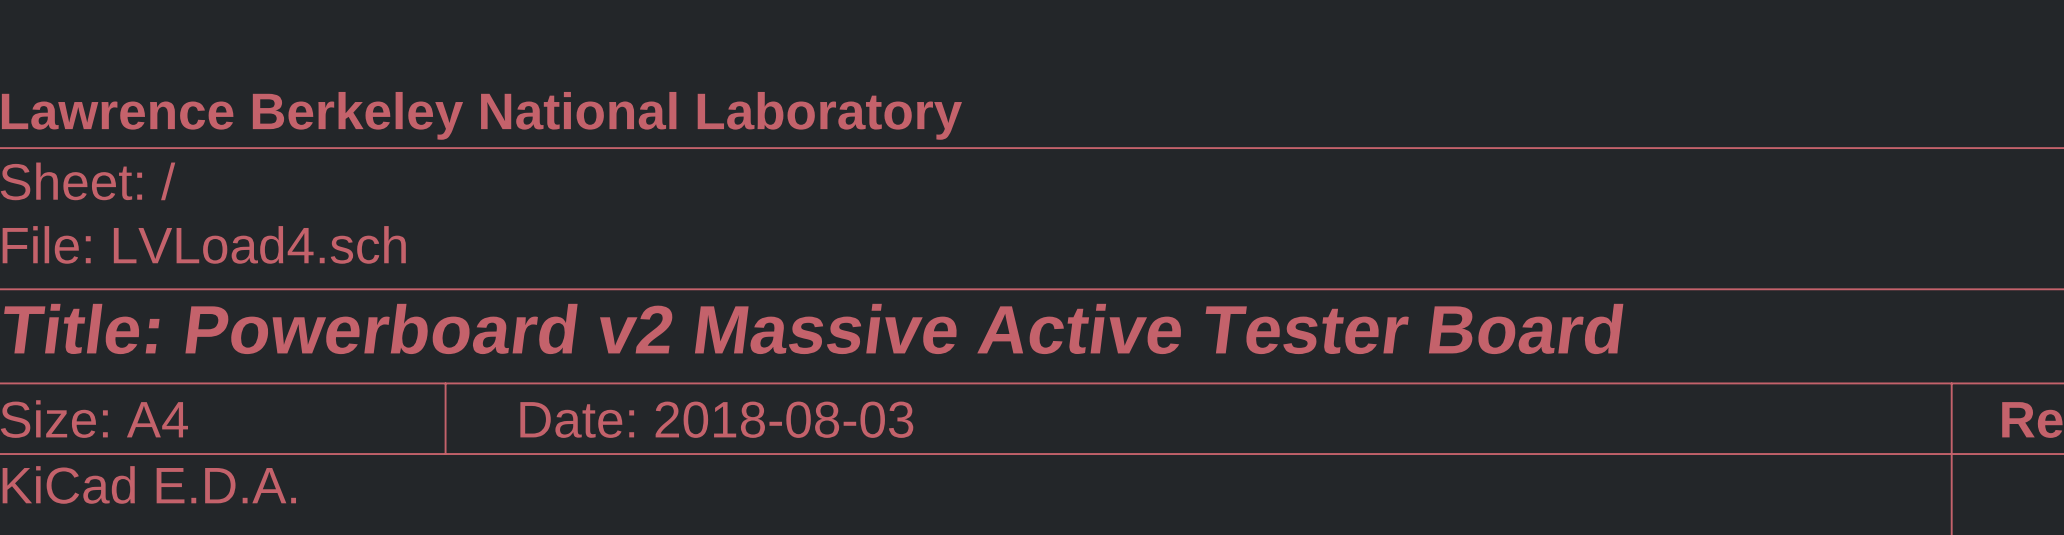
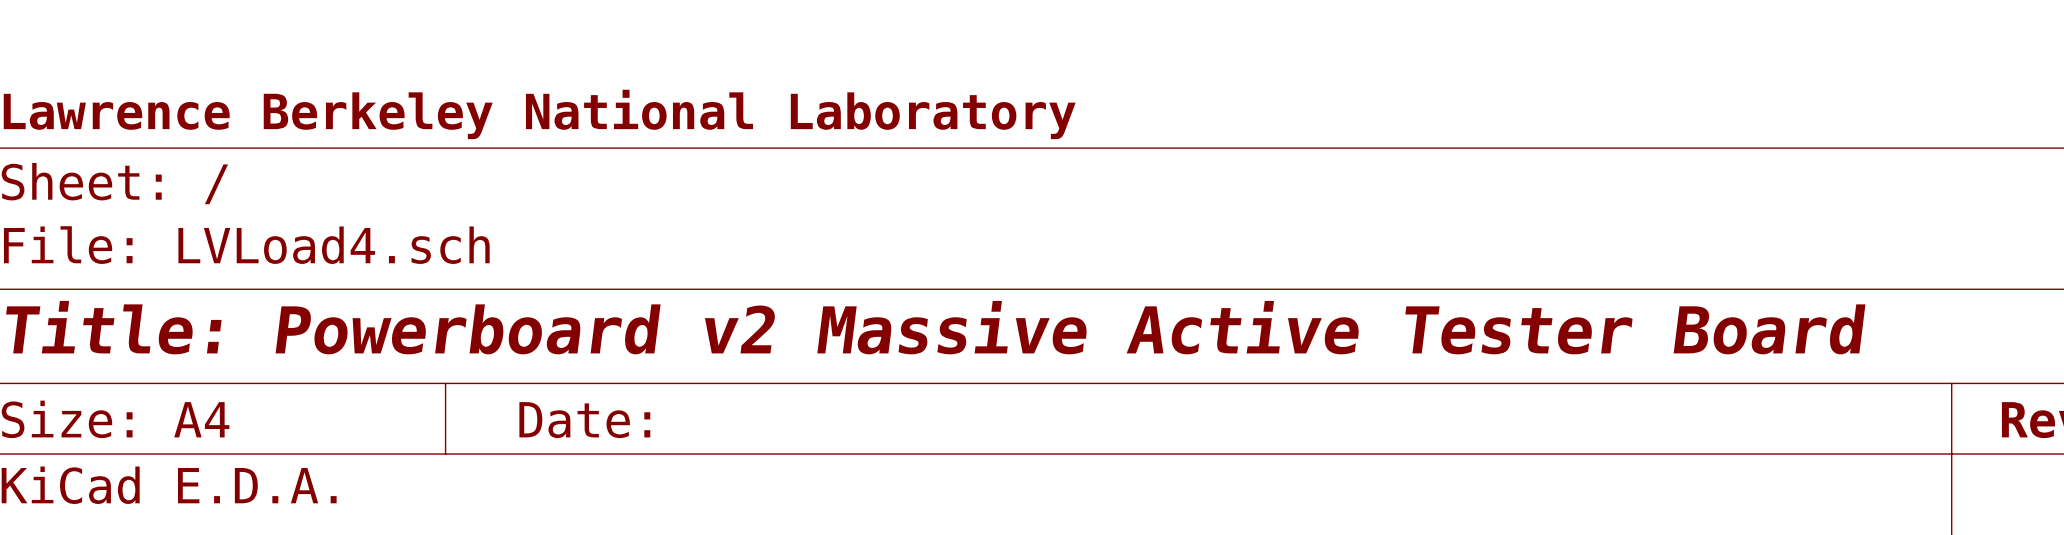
title block: Date: 2018-08-03 (716, 419) -> Date: (584, 420)

